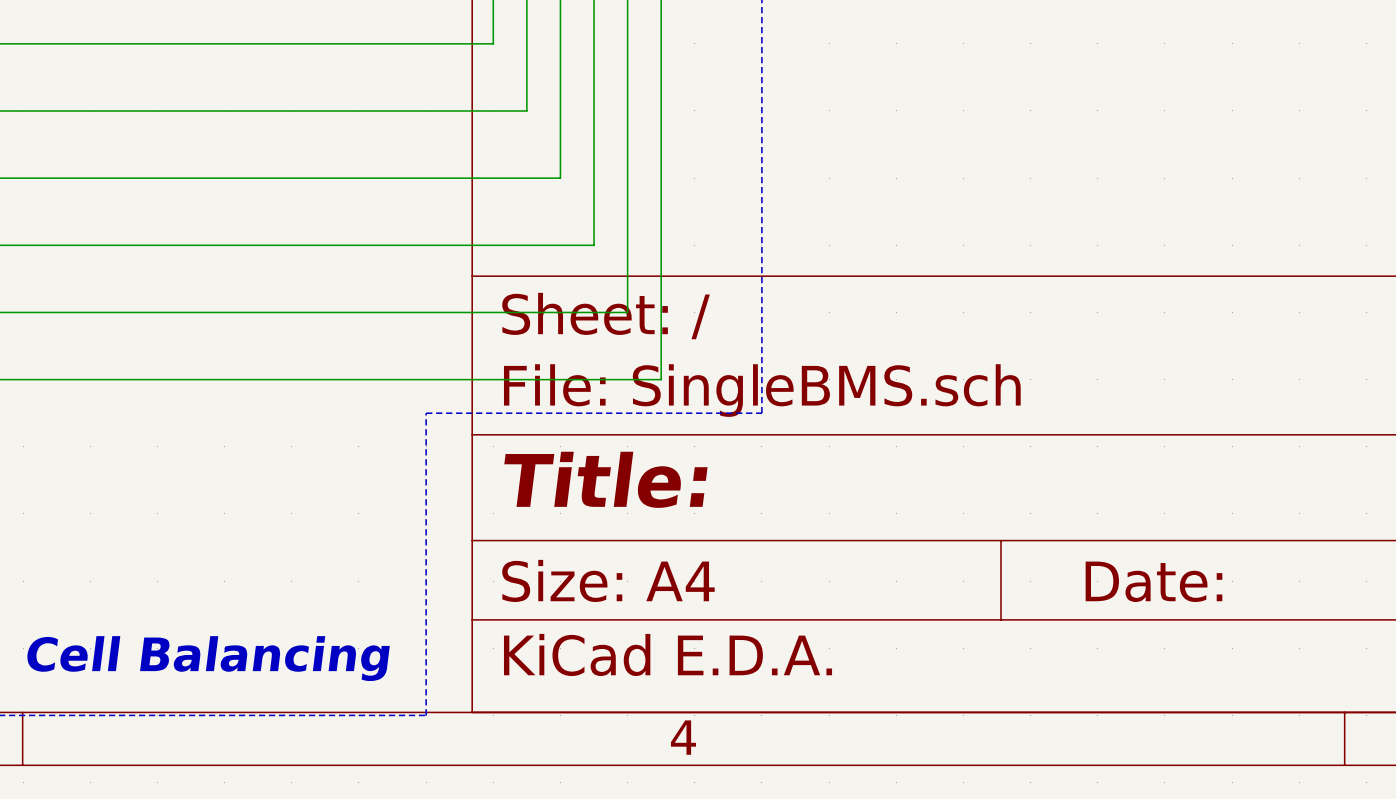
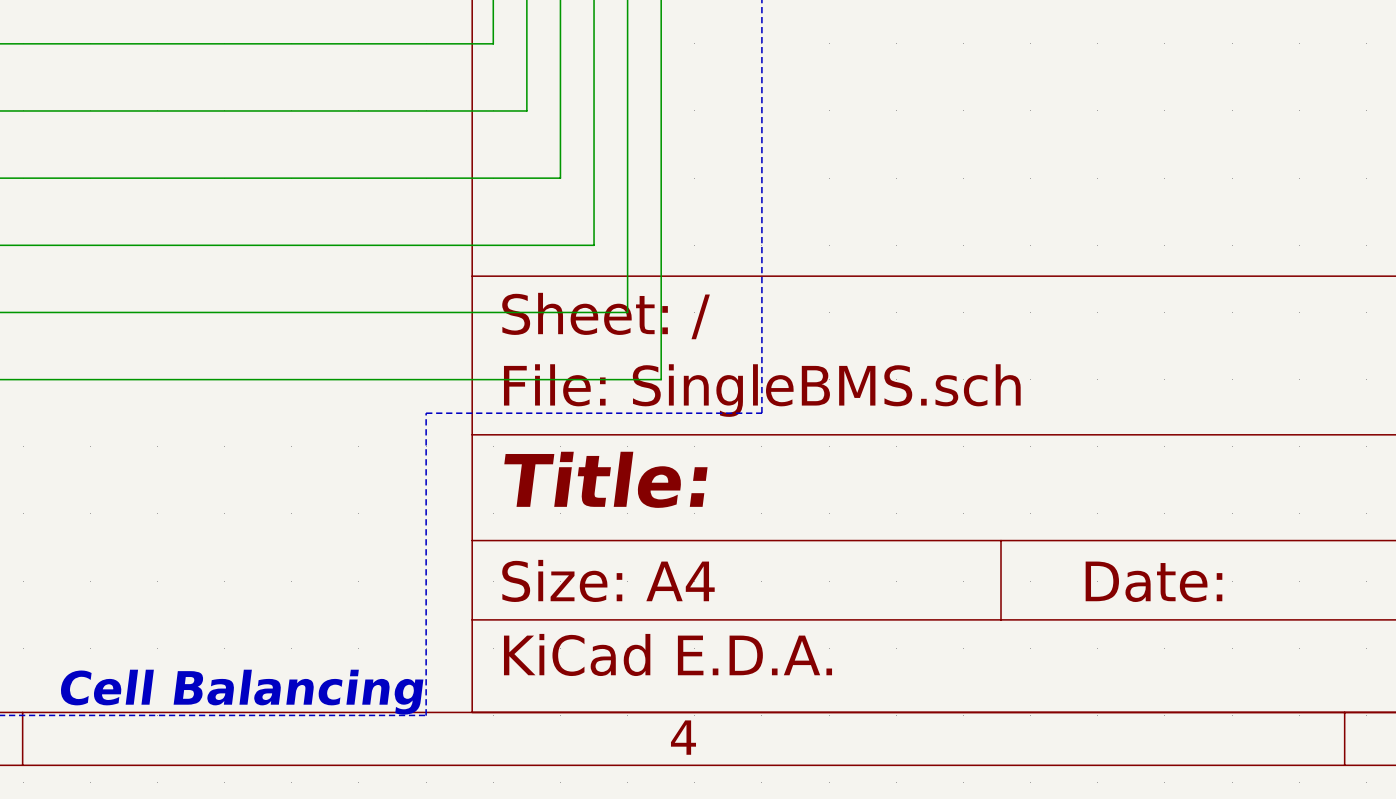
text position: Cell Balancing (208, 658) -> Cell Balancing (241, 692)

